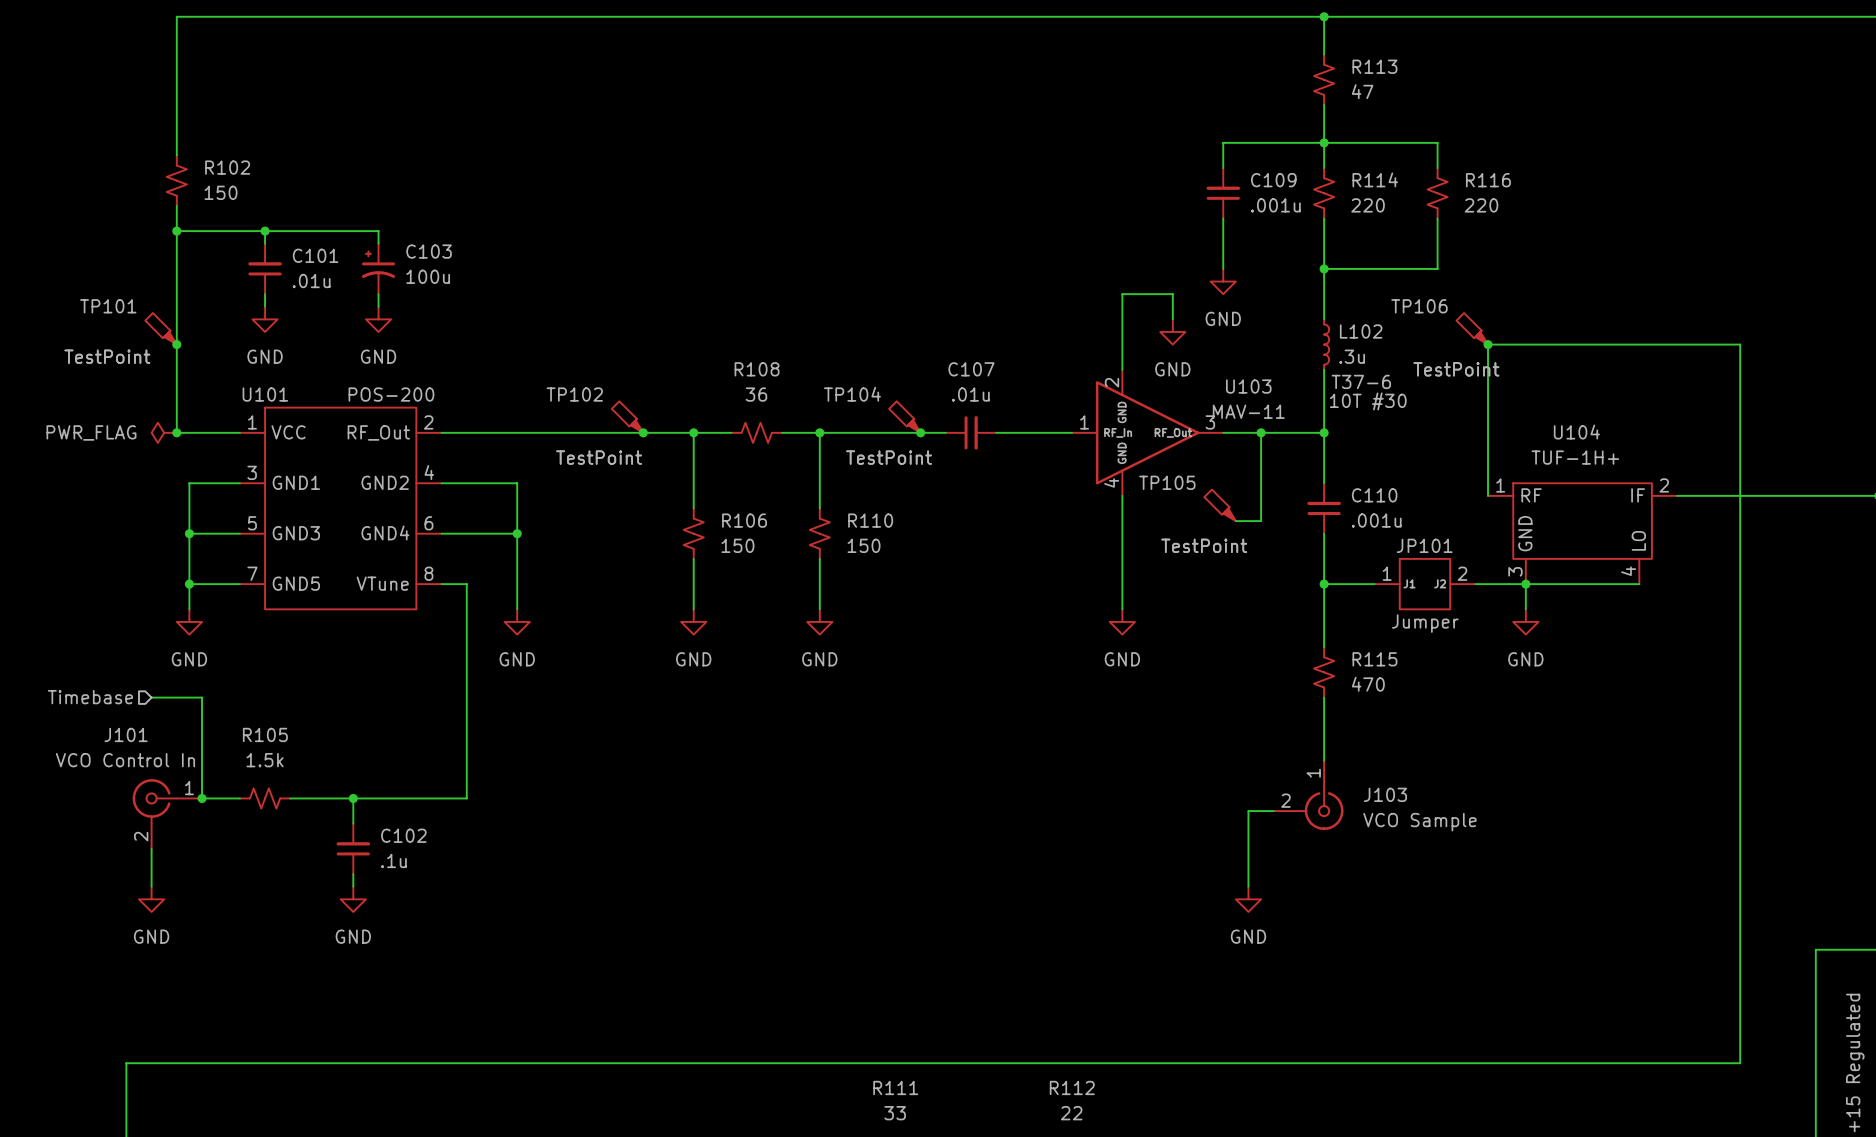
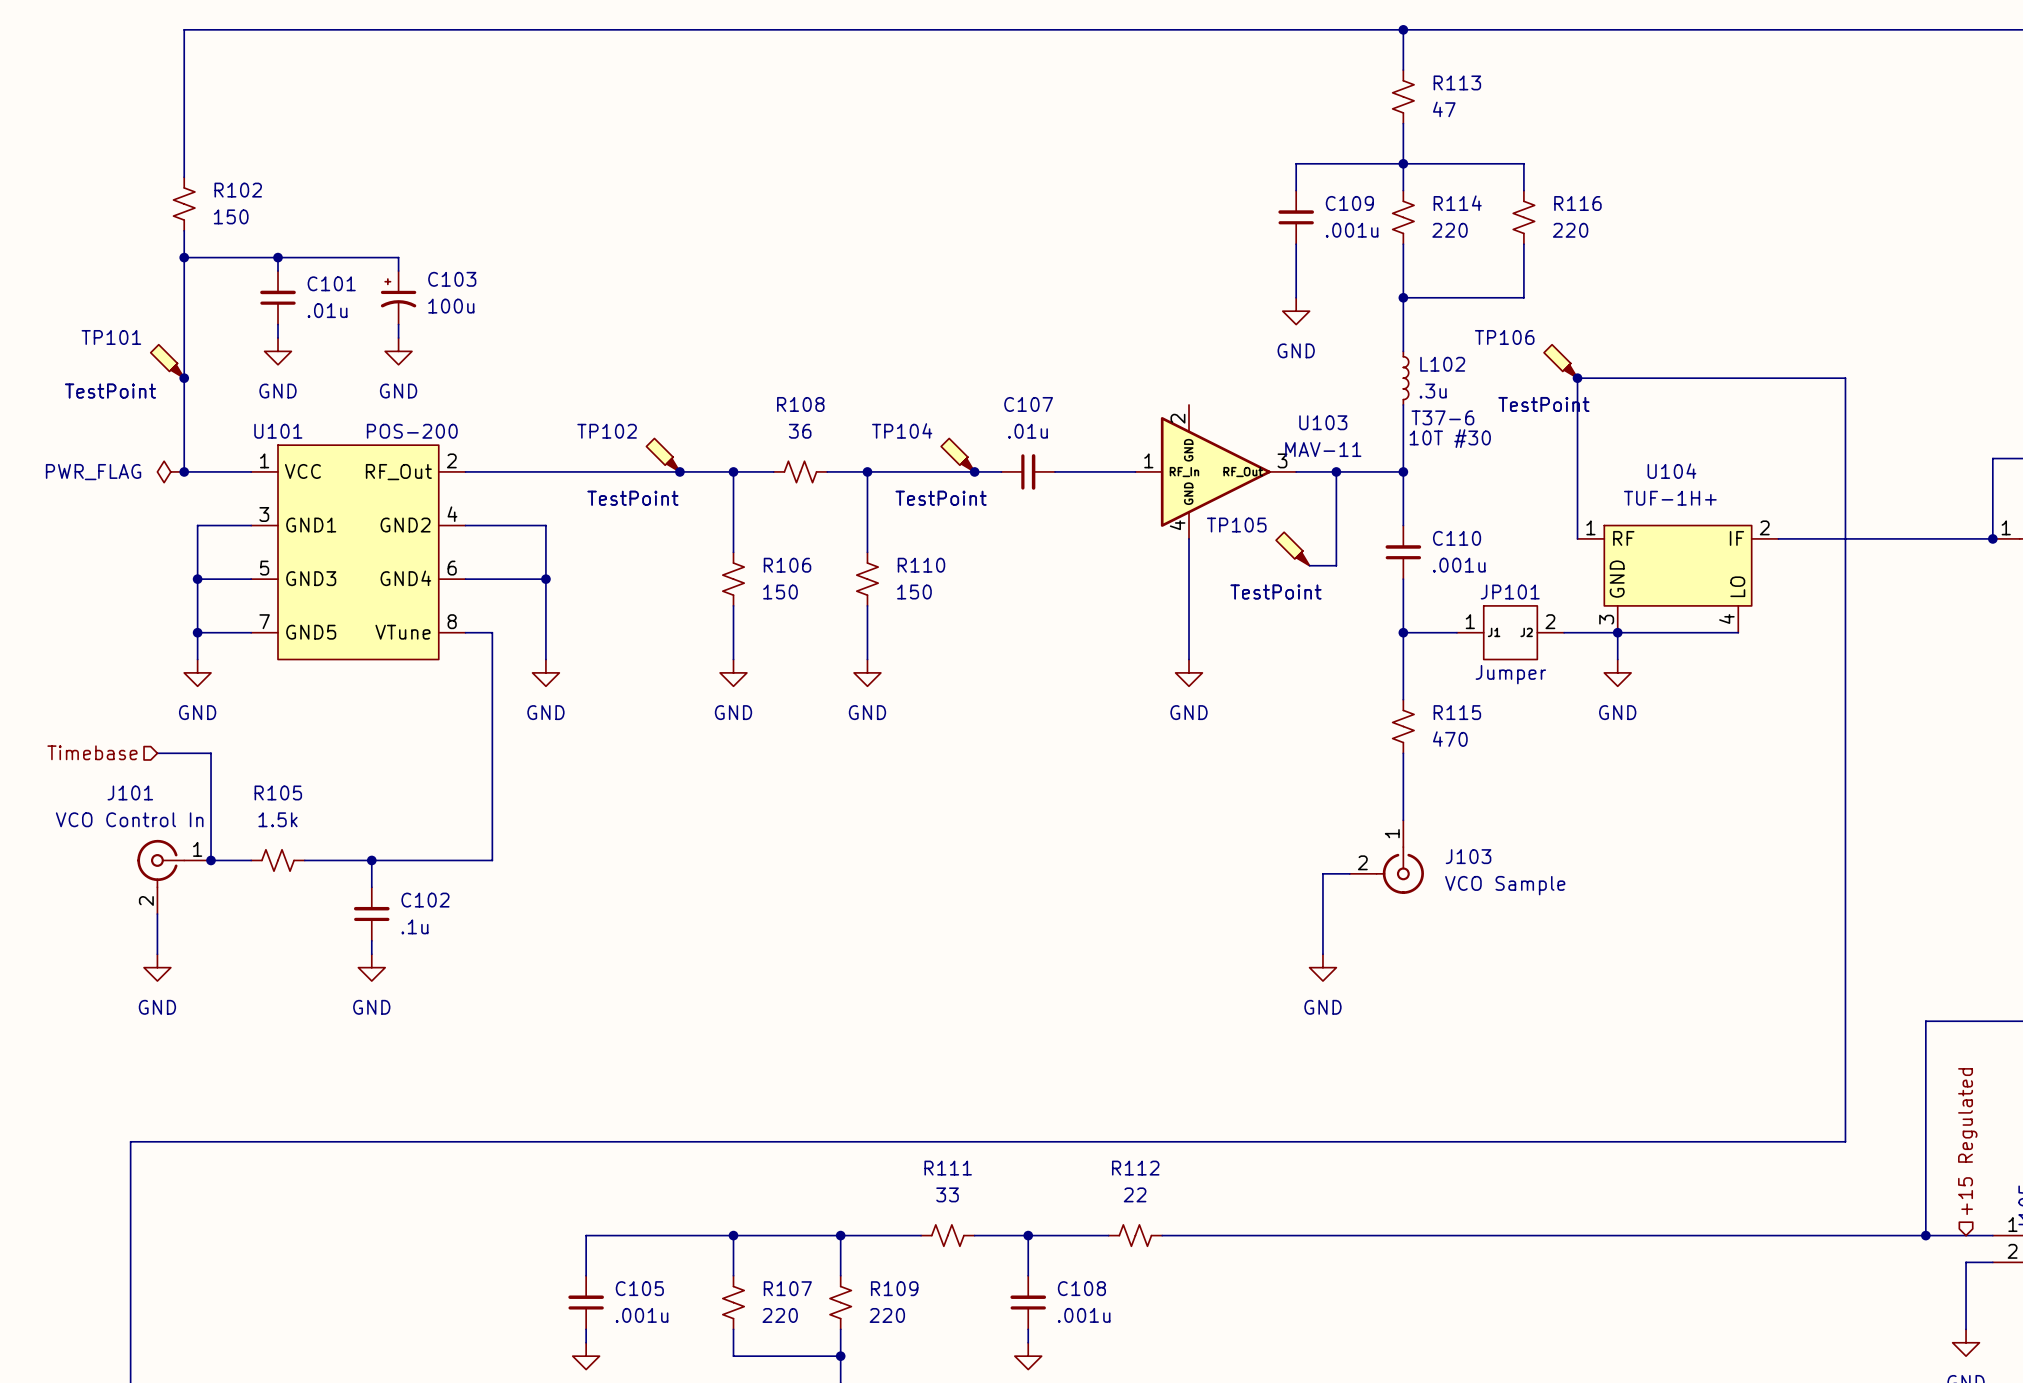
wire: (1172, 319) (1172, 294) (1122, 294) (1122, 369) -> none
power symbol: GND (1172, 331) -> none

